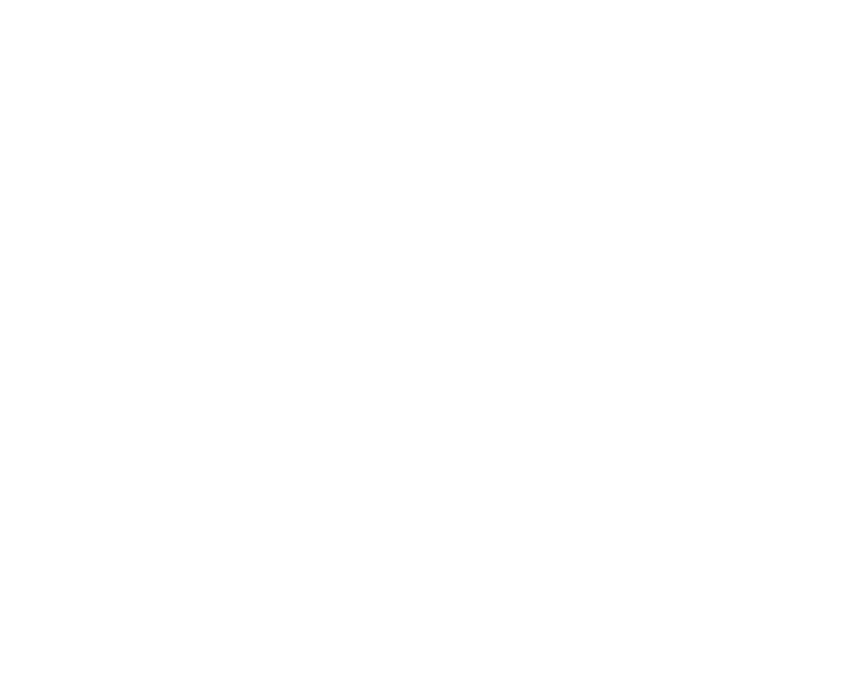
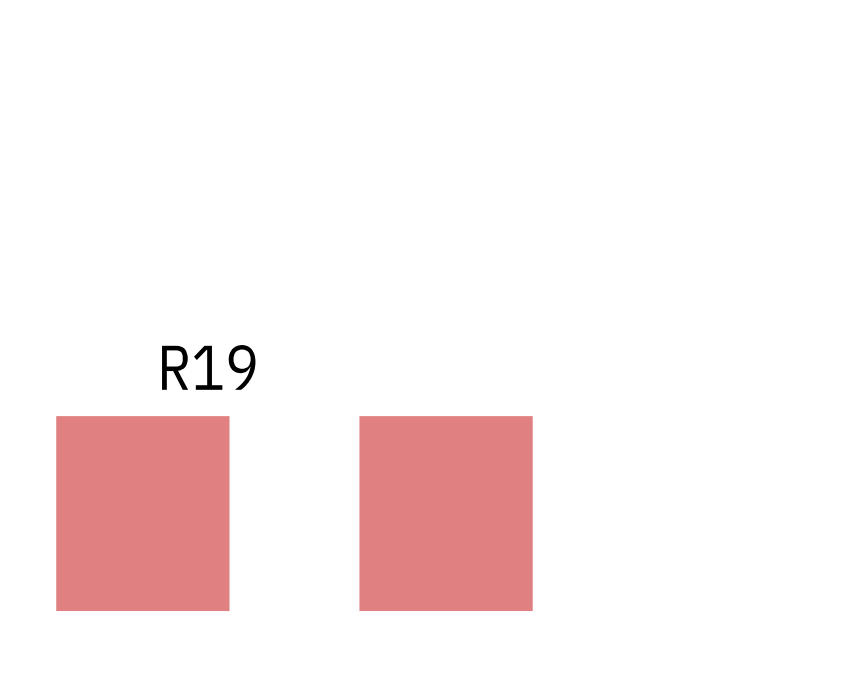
R19: none -> (294, 513)

